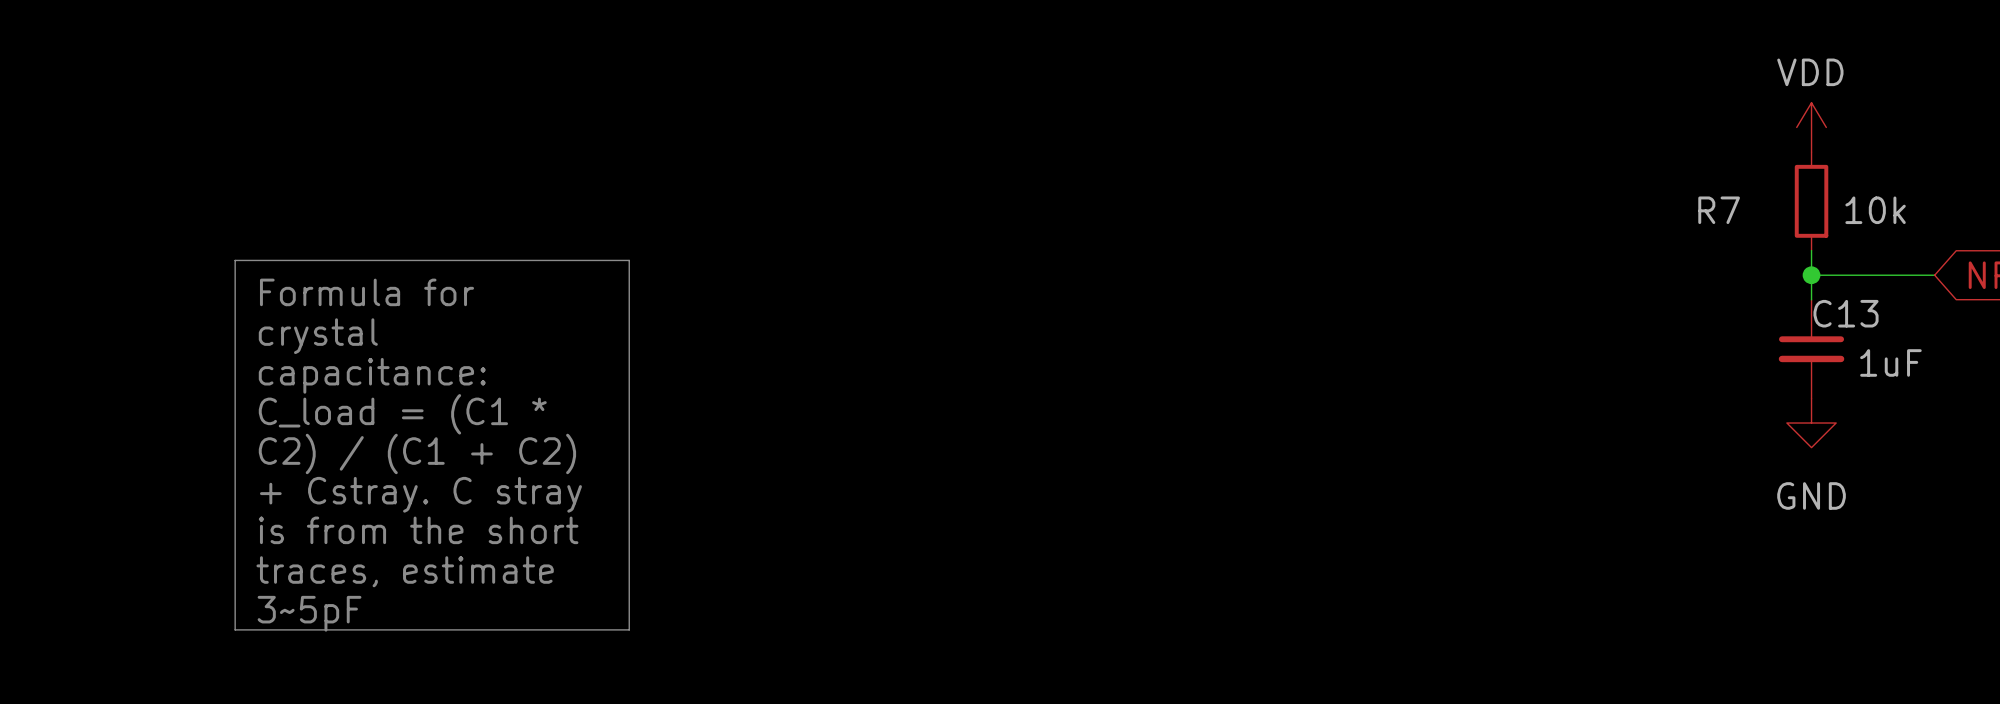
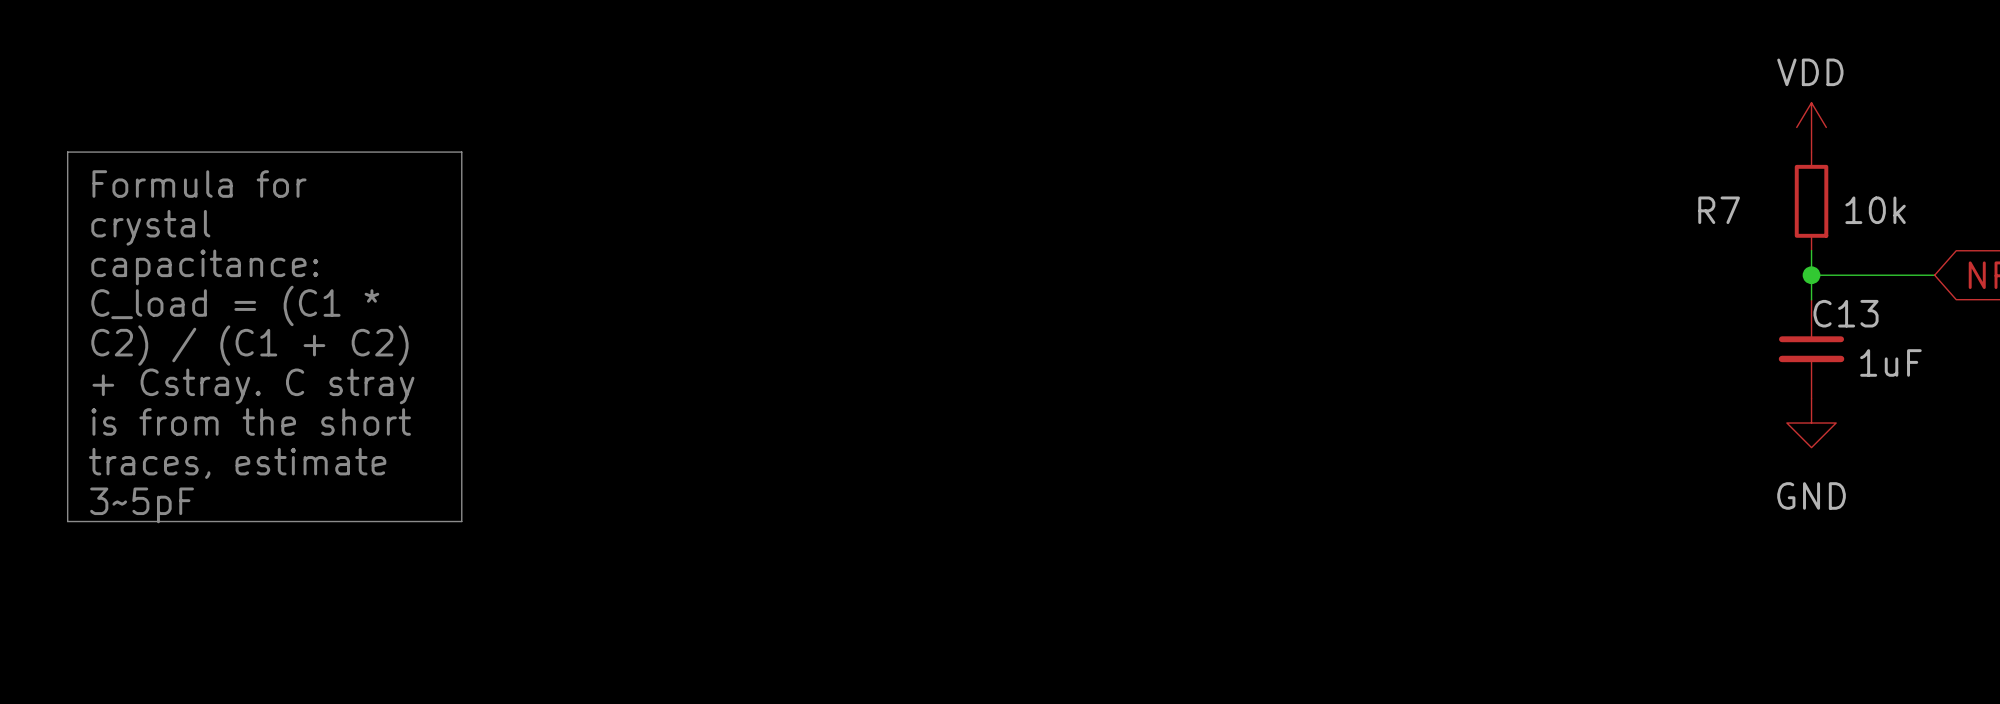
line: (235, 260) (629, 260) (629, 629) (235, 629) (235, 260) -> (67, 152) (461, 152) (461, 521) (67, 521) (67, 152)
text position: Formula for (367, 292) -> Formula for (199, 184)
text position: crystal (318, 336) -> crystal (150, 227)
text position: capacitance: (372, 375) -> capacitance: (204, 267)
text position: C_load = (C1 * (402, 414) -> C_load = (C1 * (235, 305)
text position: C2) / (C1 + C2) (417, 453) -> C2) / (C1 + C2) (249, 345)
text position: + Cstray. C stray (420, 494) -> + Cstray. C stray (253, 386)
text position: is from the short (418, 530) -> is from the short (251, 421)
text position: traces, estimate (405, 571) -> traces, estimate (237, 463)
text position: 3~5pF (309, 613) -> 3~5pF (142, 505)

